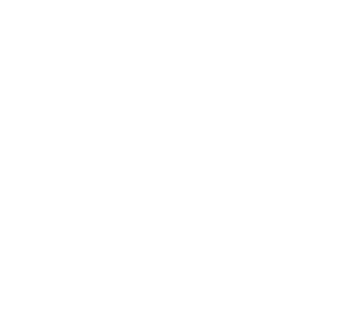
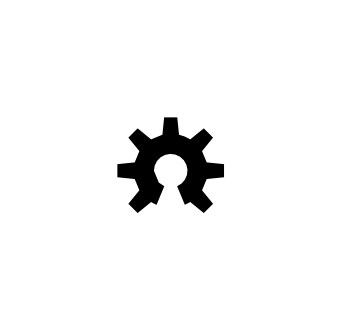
drawing: none -> [117, 117, 225, 214]

